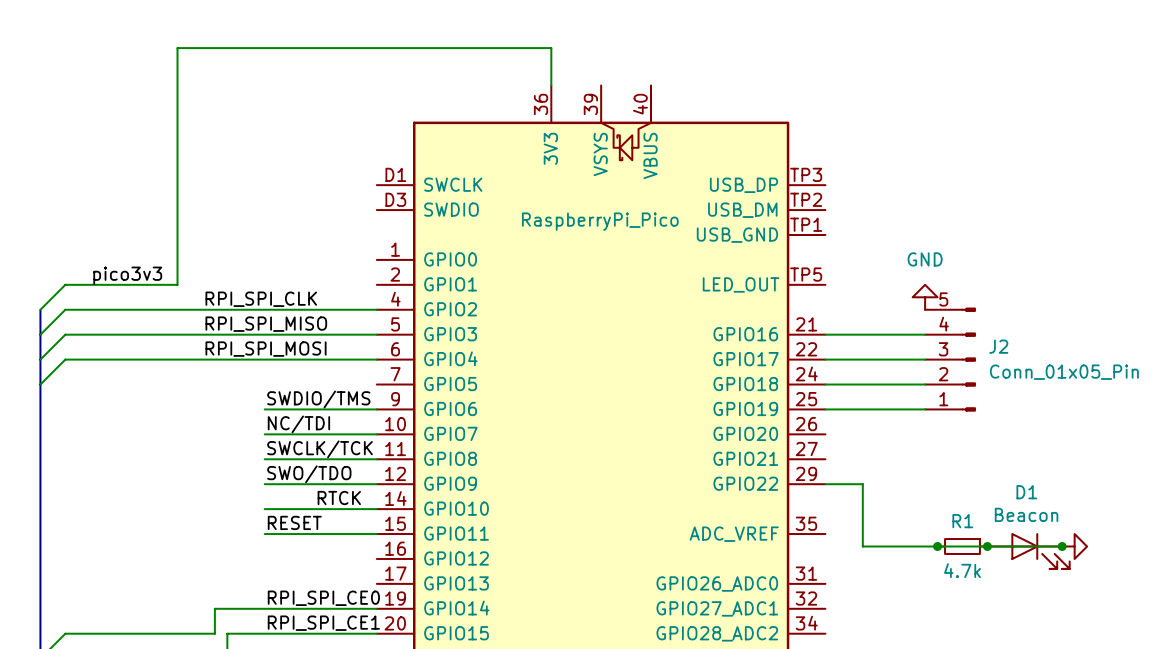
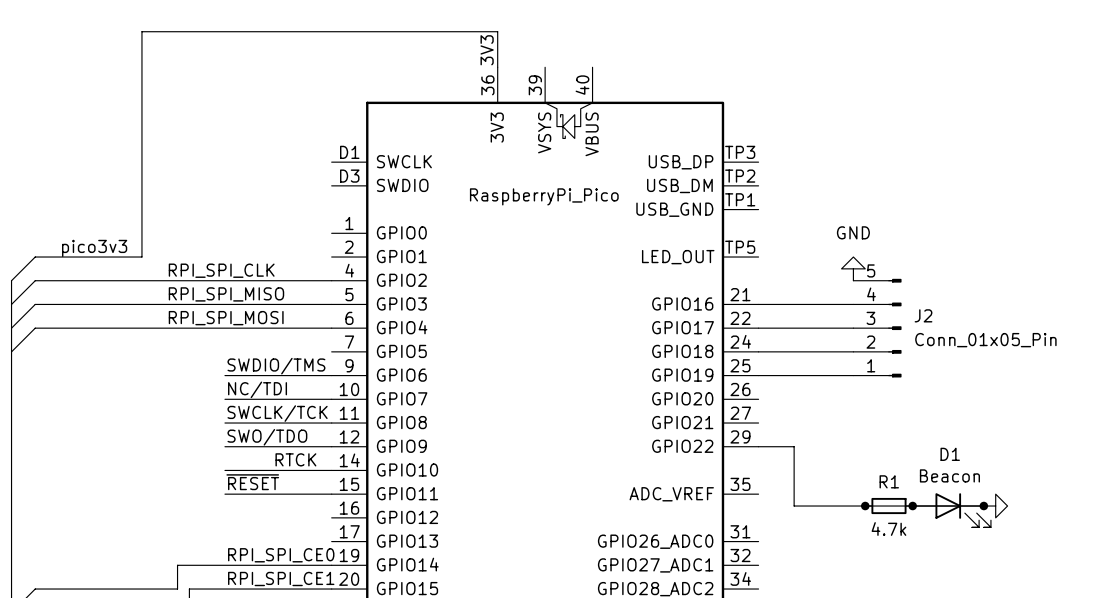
label: none -> 3V3 (487, 50)
label: RESET (294, 522) -> ~{RESET} (252, 482)

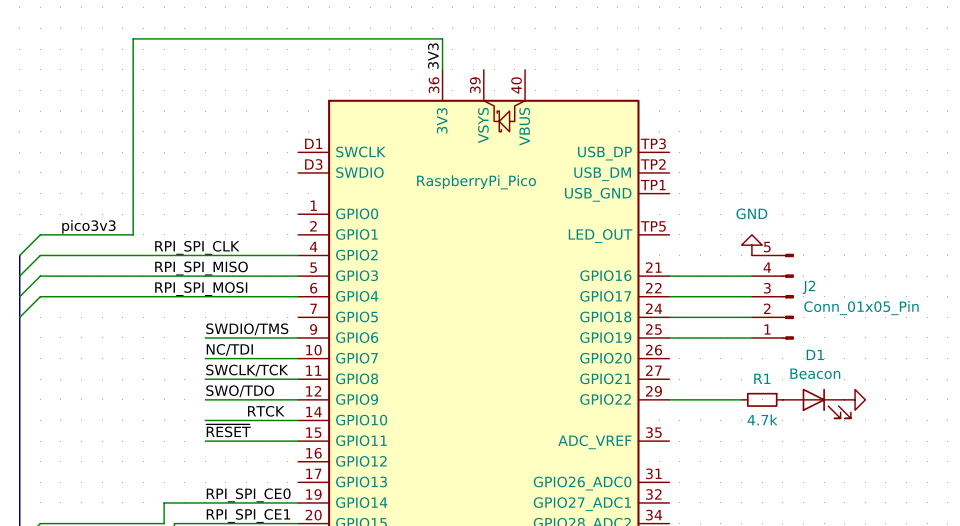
wire: (794, 446) (794, 506) (983, 506) -> (700, 399) (741, 399)
junction: (865, 506) -> none
R1 position: (888, 506) -> (762, 399)
junction: (912, 506) -> none
junction: (983, 506) -> none
power symbol position: (995, 506) -> (855, 399)
D1 position: (951, 510) -> (816, 403)

